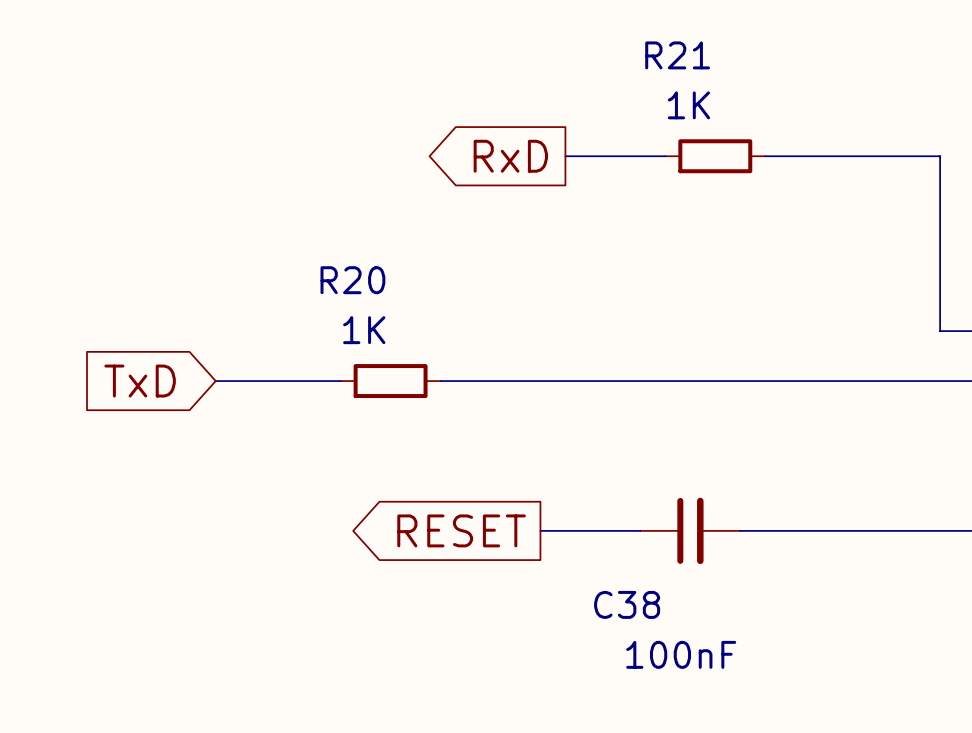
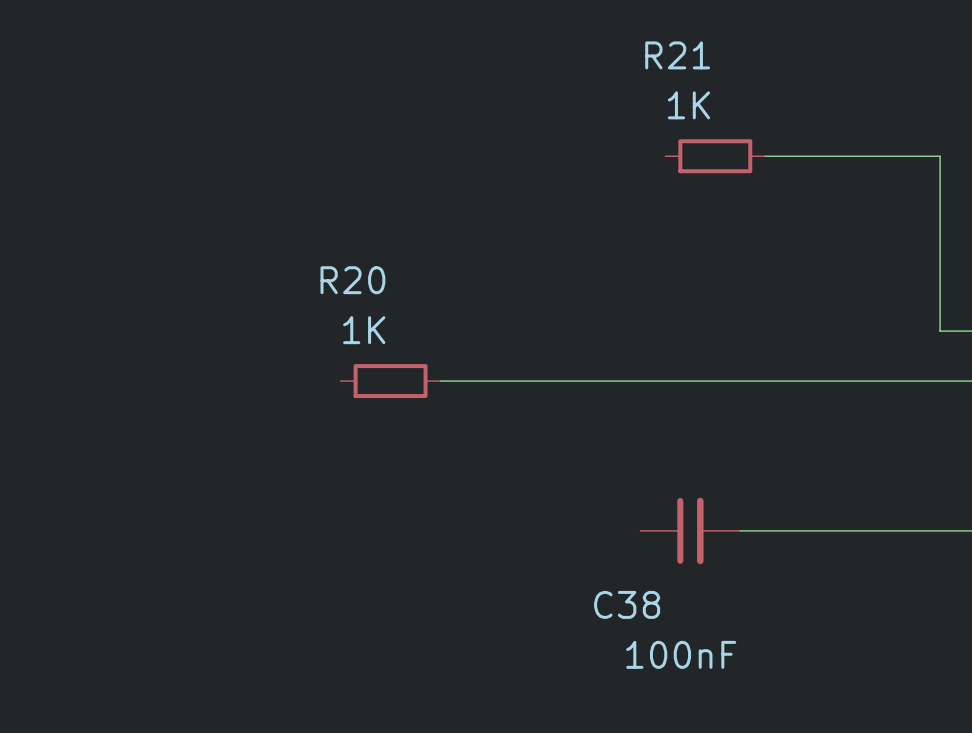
global label: RxD (510, 156) -> none
wire: (565, 156) (665, 156) -> none
global label: TxD (140, 381) -> none
wire: (215, 381) (340, 381) -> none
global label: RESET (461, 530) -> none
wire: (540, 530) (640, 530) -> none

